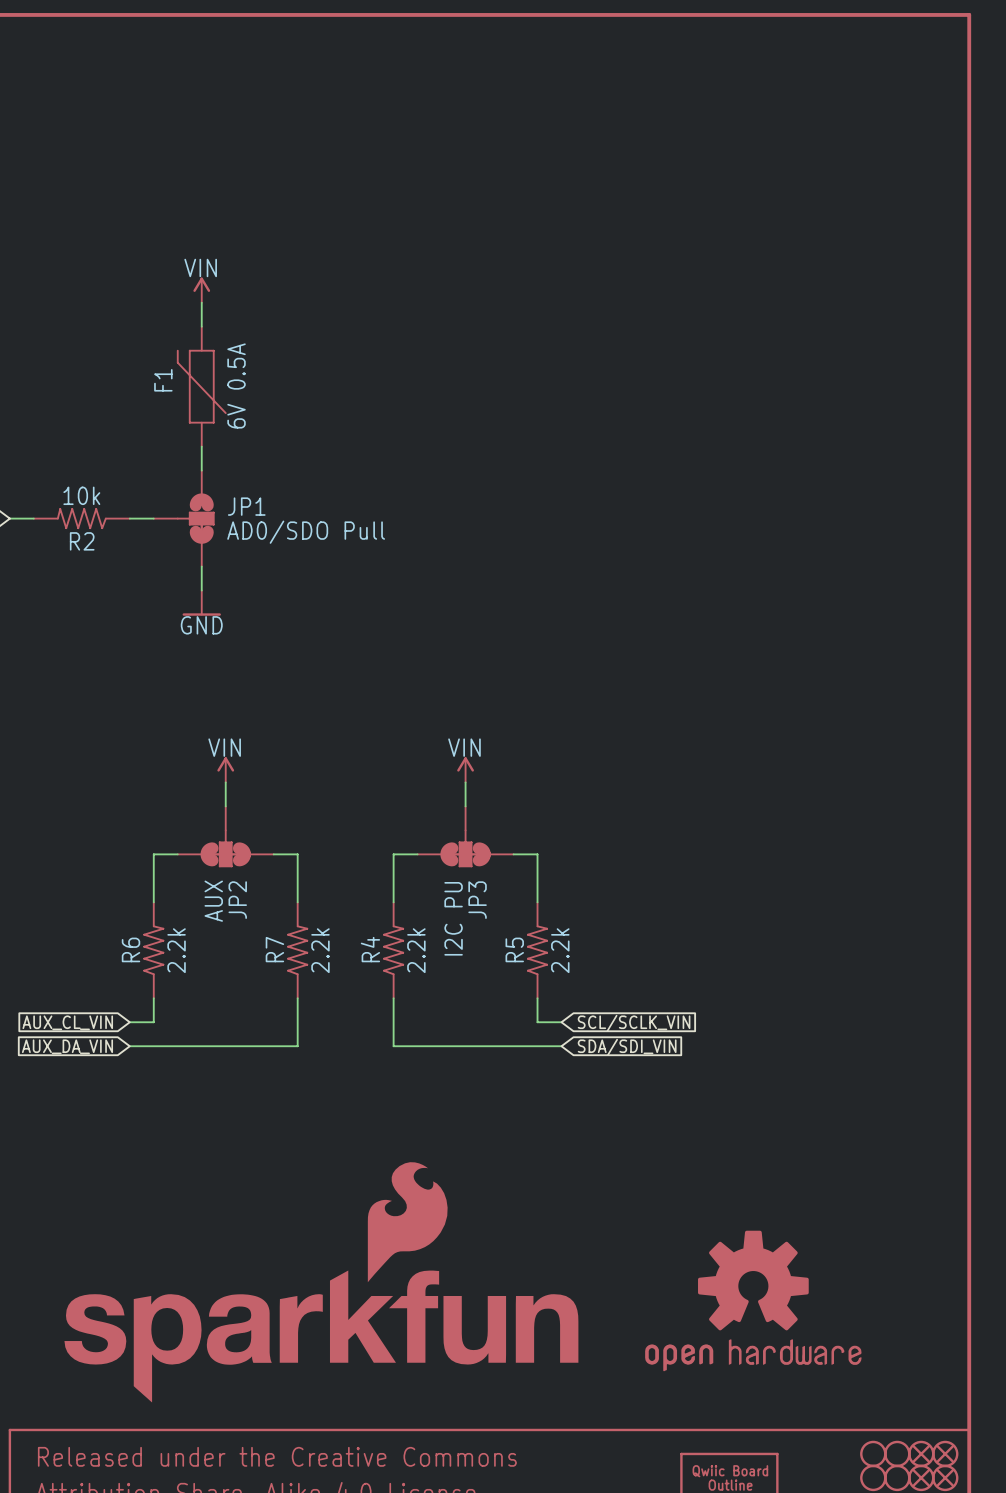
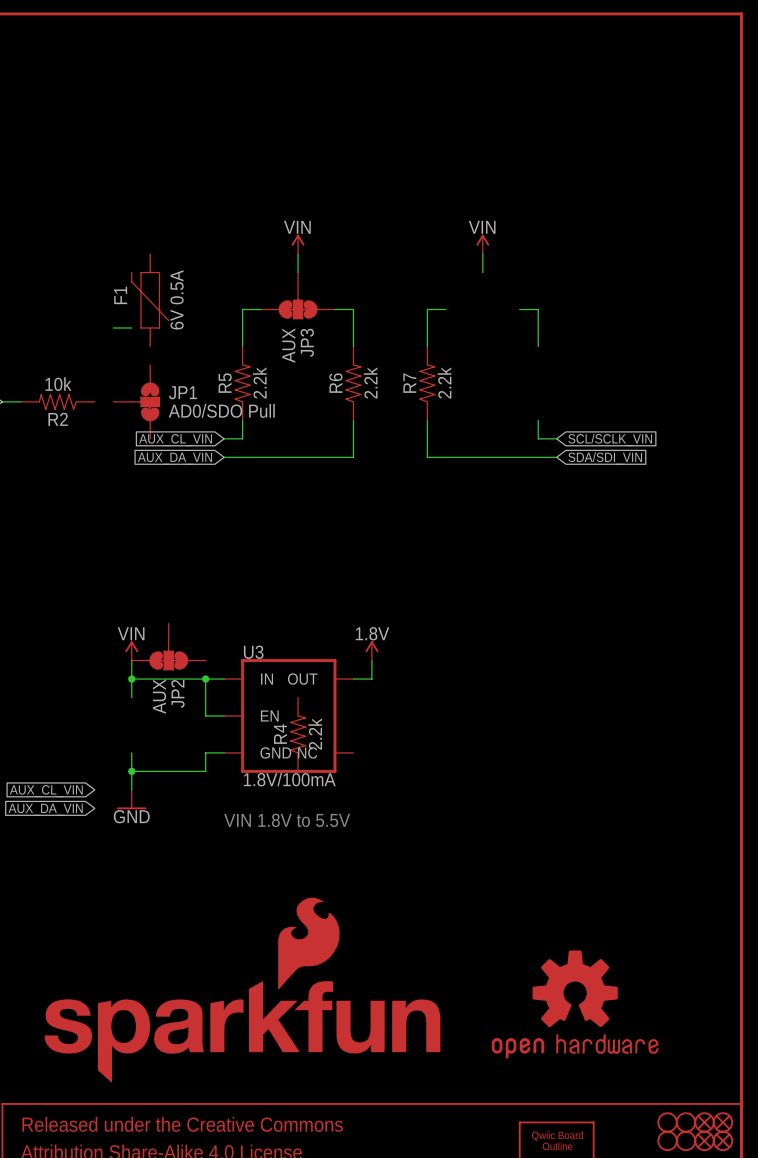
power symbol position: VIN (201, 290) -> VIN (298, 244)
wire: (201, 302) (201, 326) -> (298, 254) (298, 272)
power symbol: none -> VIN (482, 244)
wire: none -> (482, 254) (482, 272)
wire: none -> (261, 309) (242, 309) (242, 346)
wire: none -> (334, 309) (353, 309) (353, 346)
wire: none -> (445, 309) (427, 309) (427, 346)
wire: none -> (519, 309) (538, 309) (538, 346)
wire: (201, 446) (201, 470) -> none
wire: (129, 518) (153, 518) -> (113, 327) (131, 327)
wire: none -> (242, 420) (242, 438) (224, 438)
wire: none -> (353, 420) (353, 457) (224, 457)
wire: none -> (427, 420) (427, 457) (556, 457)
wire: none -> (538, 420) (538, 438) (556, 438)
global label: none -> AUX_CL_VIN (175, 440)
global label: none -> SCL/SCLK_VIN (610, 439)
global label: none -> AUX_DA_VIN (174, 458)
global label: none -> SDA/SDI_VIN (605, 458)
power symbol: GND (201, 603) -> none
power symbol position: VIN (225, 769) -> VIN (131, 650)
power symbol: VIN (465, 769) -> none
wire: (225, 782) (225, 806) -> none
wire: (465, 782) (465, 806) -> none
JP3 position: (465, 836) -> (298, 295)
power symbol: none -> 1.8V (371, 650)
wire: (177, 854) (153, 854) (153, 902) -> (131, 660) (131, 697)
wire: (273, 854) (297, 854) (297, 902) -> none
wire: (417, 854) (393, 854) (393, 902) -> none
wire: none -> (371, 660) (371, 679) (353, 679)
wire: (513, 854) (537, 854) (537, 902) -> none
wire: none -> (131, 679) (224, 679)
junction: none -> (131, 679)
wire: none -> (205, 679) (205, 715) (224, 715)
junction: none -> (205, 679)
JP3 value: I2C PU (453, 918) -> AUX (288, 345)
U3: none -> 1.8V/100mA (288, 715)
R6 position: (153, 950) -> (353, 383)
R7 position: (297, 950) -> (427, 383)
R5 position: (537, 950) -> (242, 383)
wire: none -> (131, 752) (131, 789)
wire: none -> (224, 752) (205, 752) (205, 771) (131, 771)
wire: (153, 998) (153, 1022) (129, 1022) -> none
junction: none -> (131, 771)
wire: (297, 998) (297, 1046) (129, 1046) -> none
wire: (393, 998) (393, 1046) (561, 1046) -> none
wire: (537, 998) (537, 1022) (561, 1022) -> none
global label: SCL/SCLK_VIN (634, 1023) -> none
power symbol: none -> GND (131, 799)
global label: SDA/SDI_VIN (627, 1047) -> none
text: none -> VIN 1.8V to 5.5V (287, 820)

